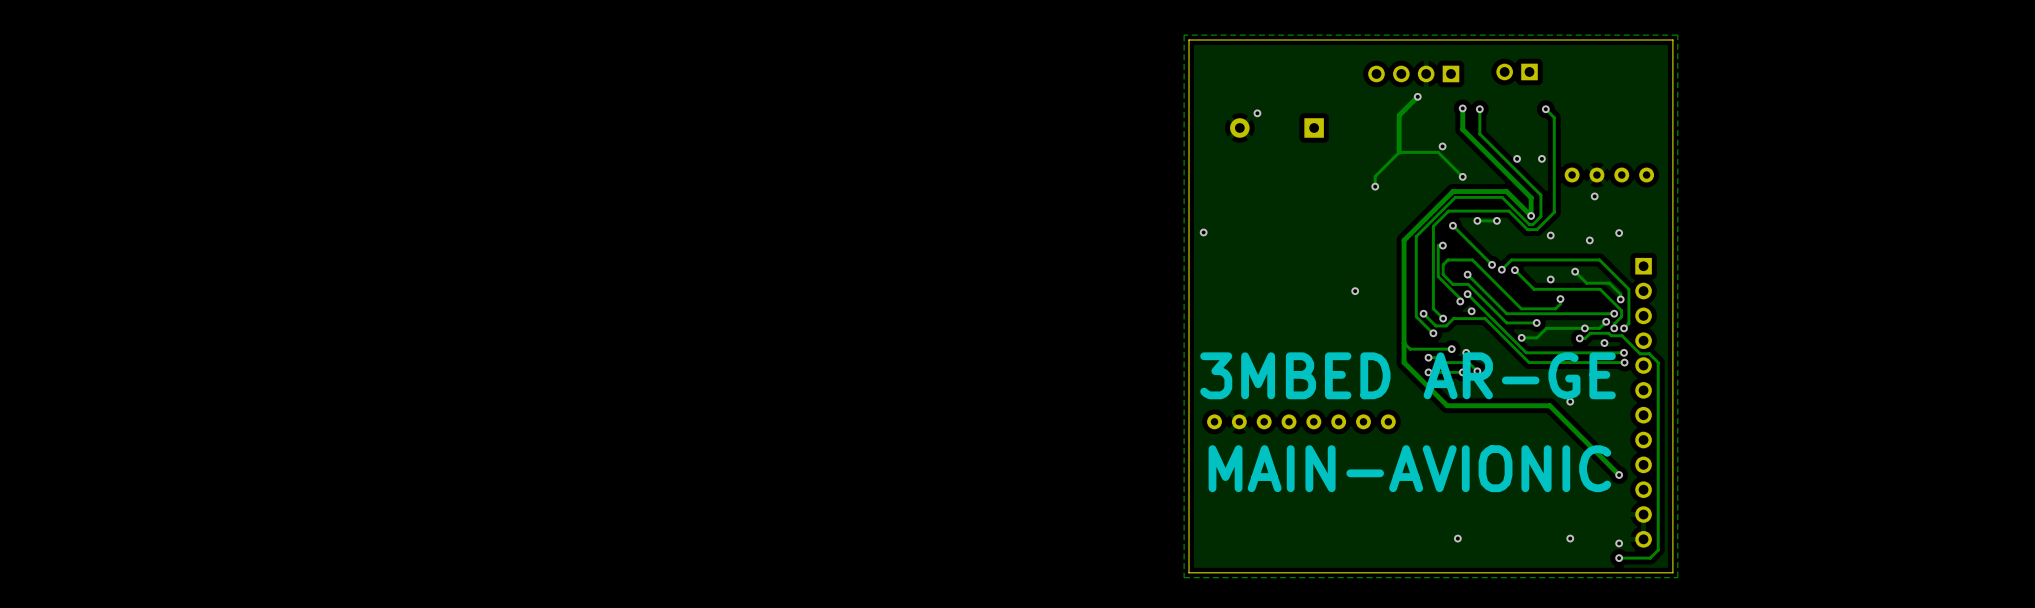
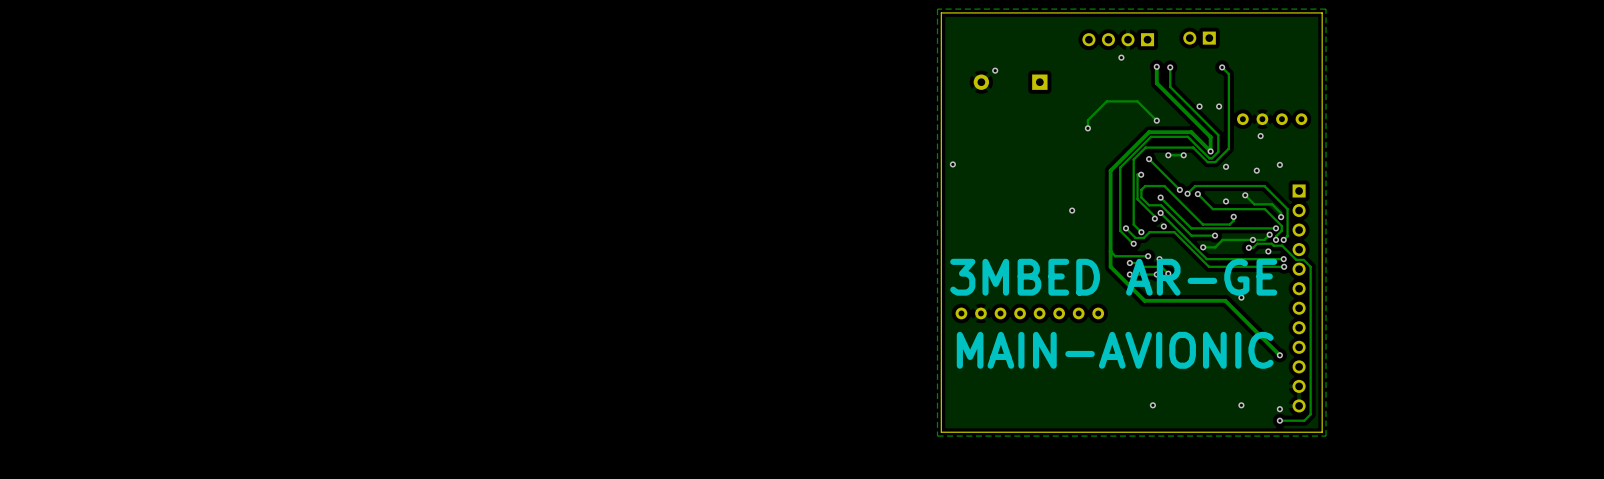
track: (1417, 96) (1399, 115) (1399, 152) -> none
via: (1442, 146) -> none

